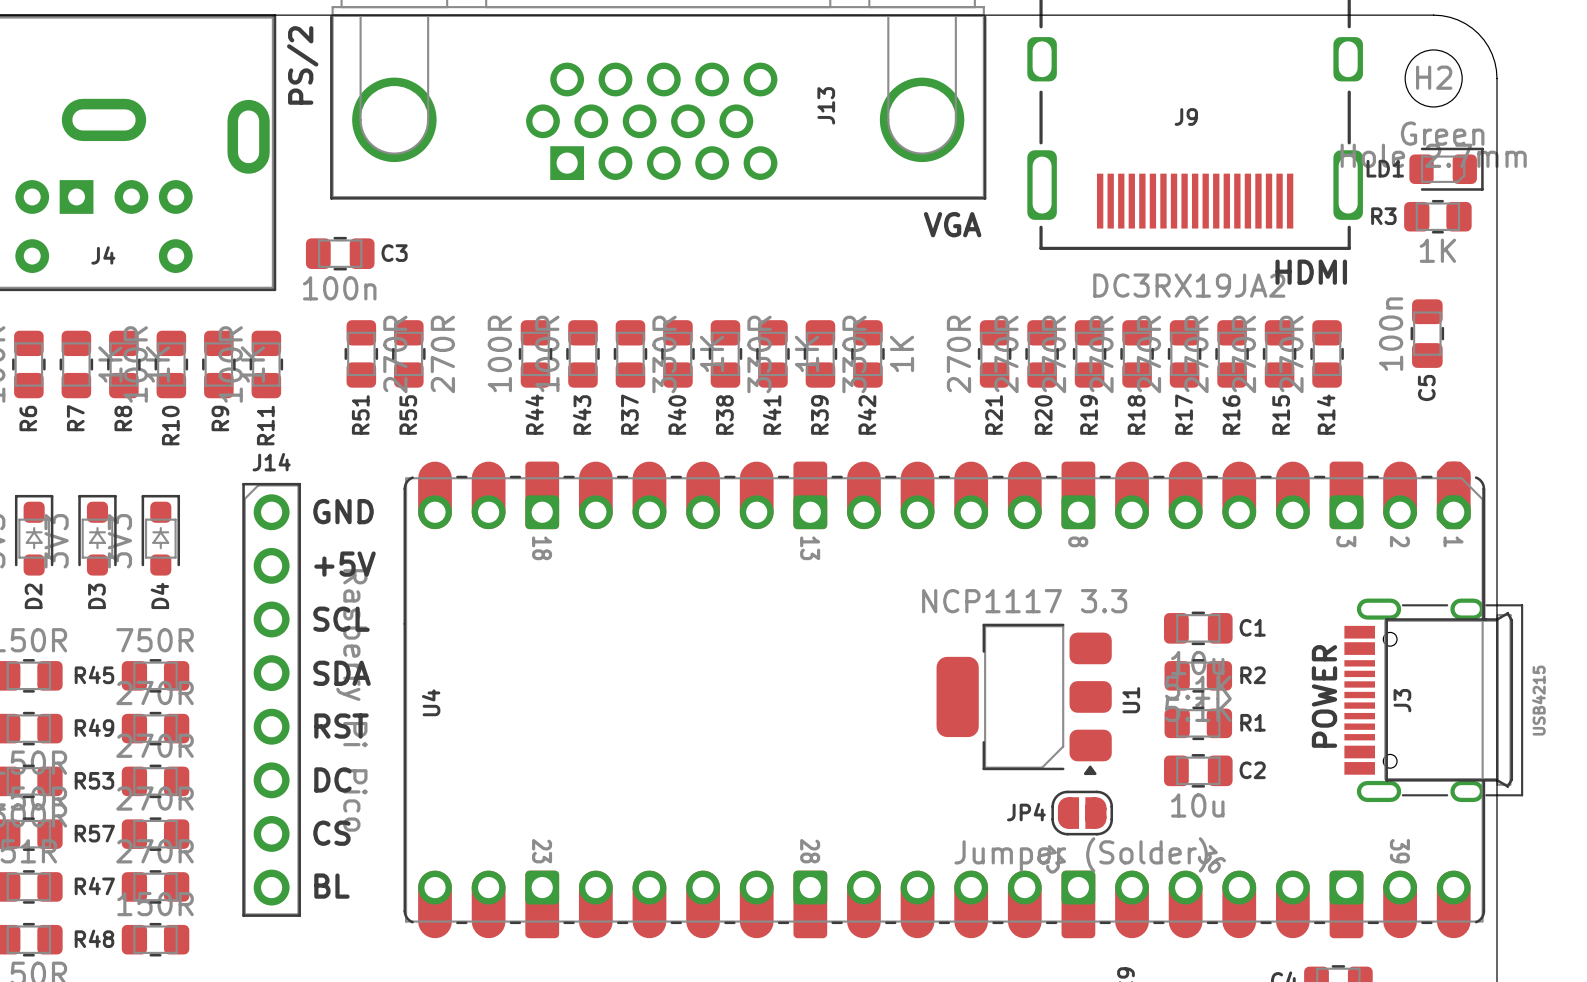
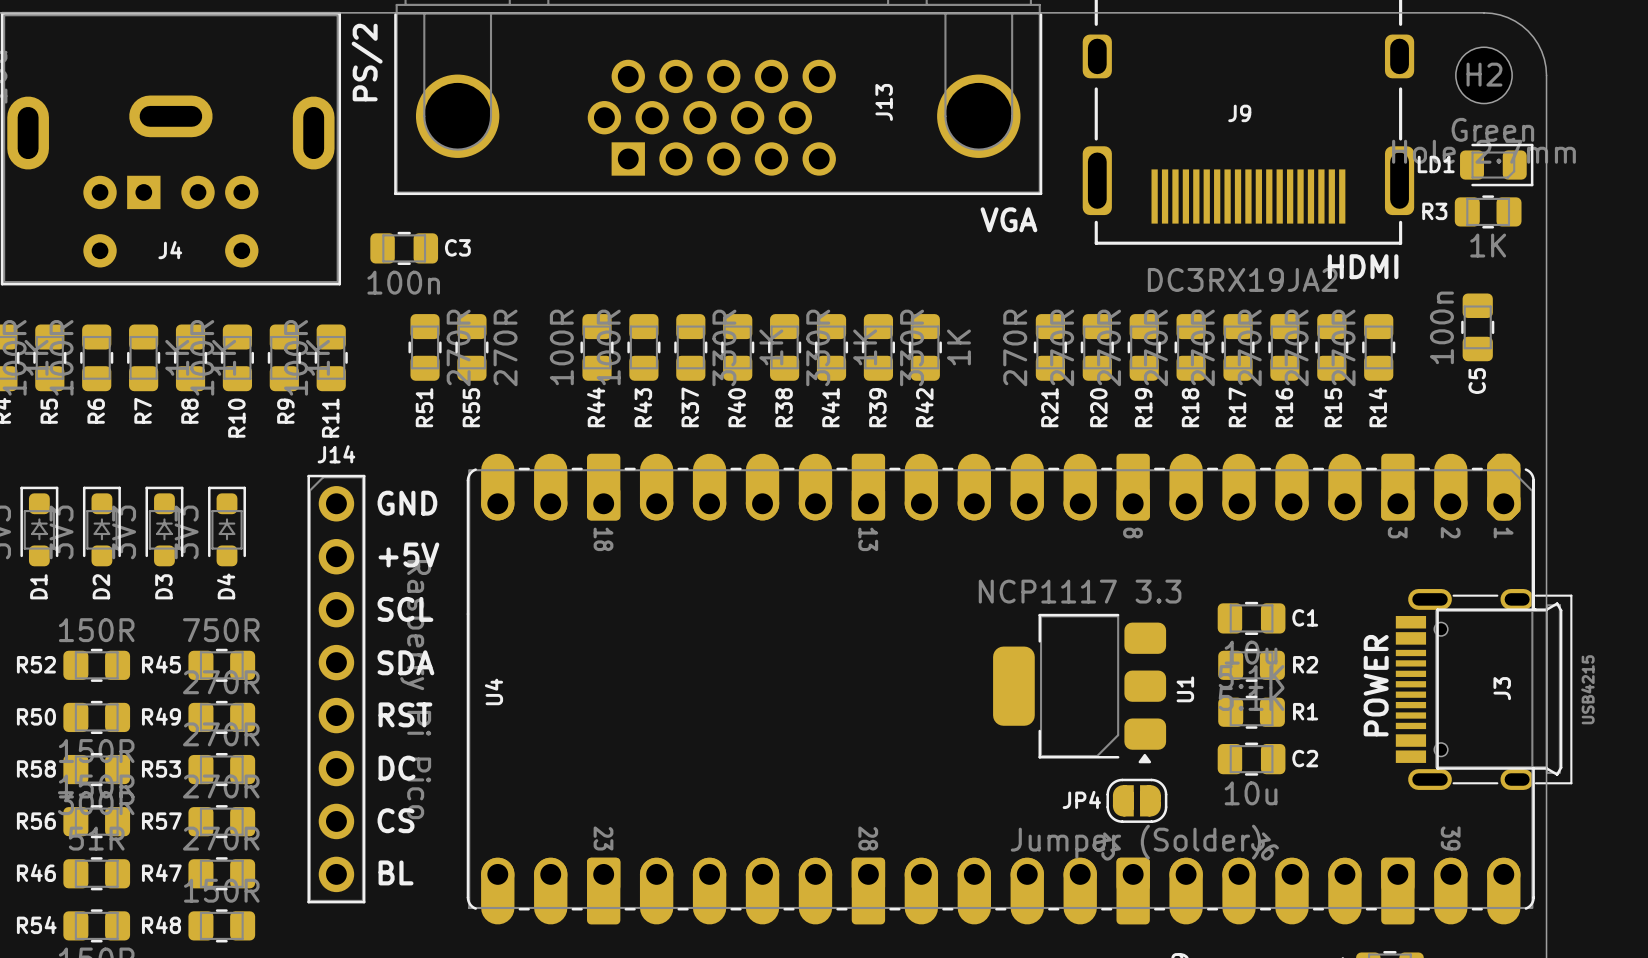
J3 name position: J3 (1402, 700) -> J3 (1502, 688)

